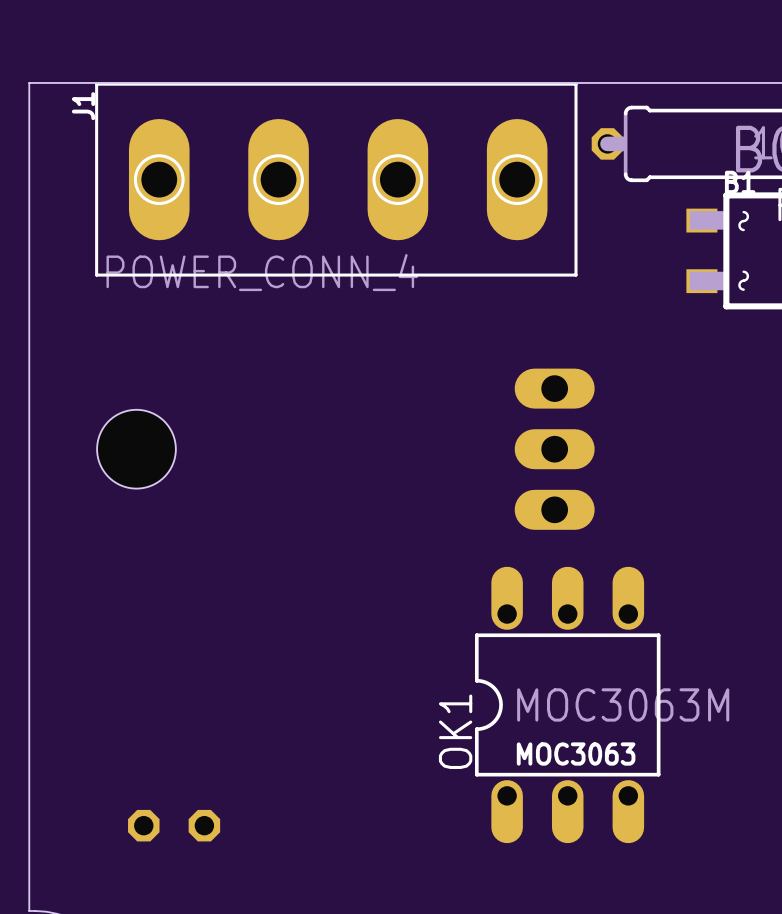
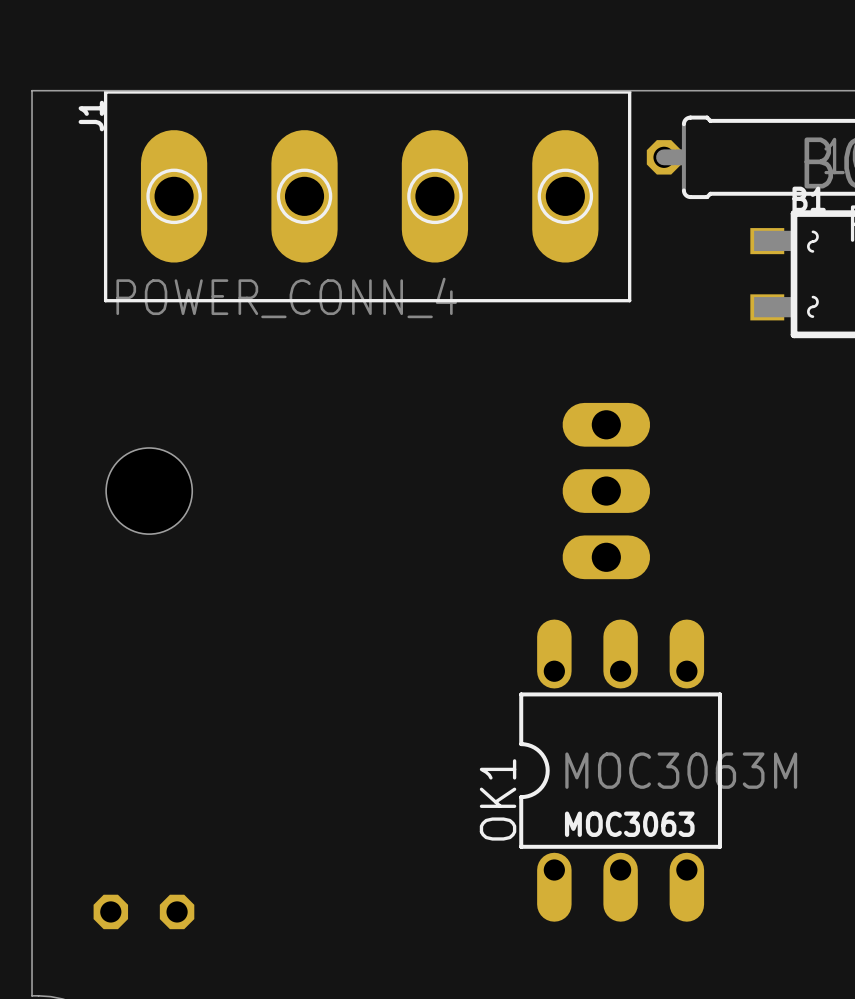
part position: (174, 825) -> (143, 911)

